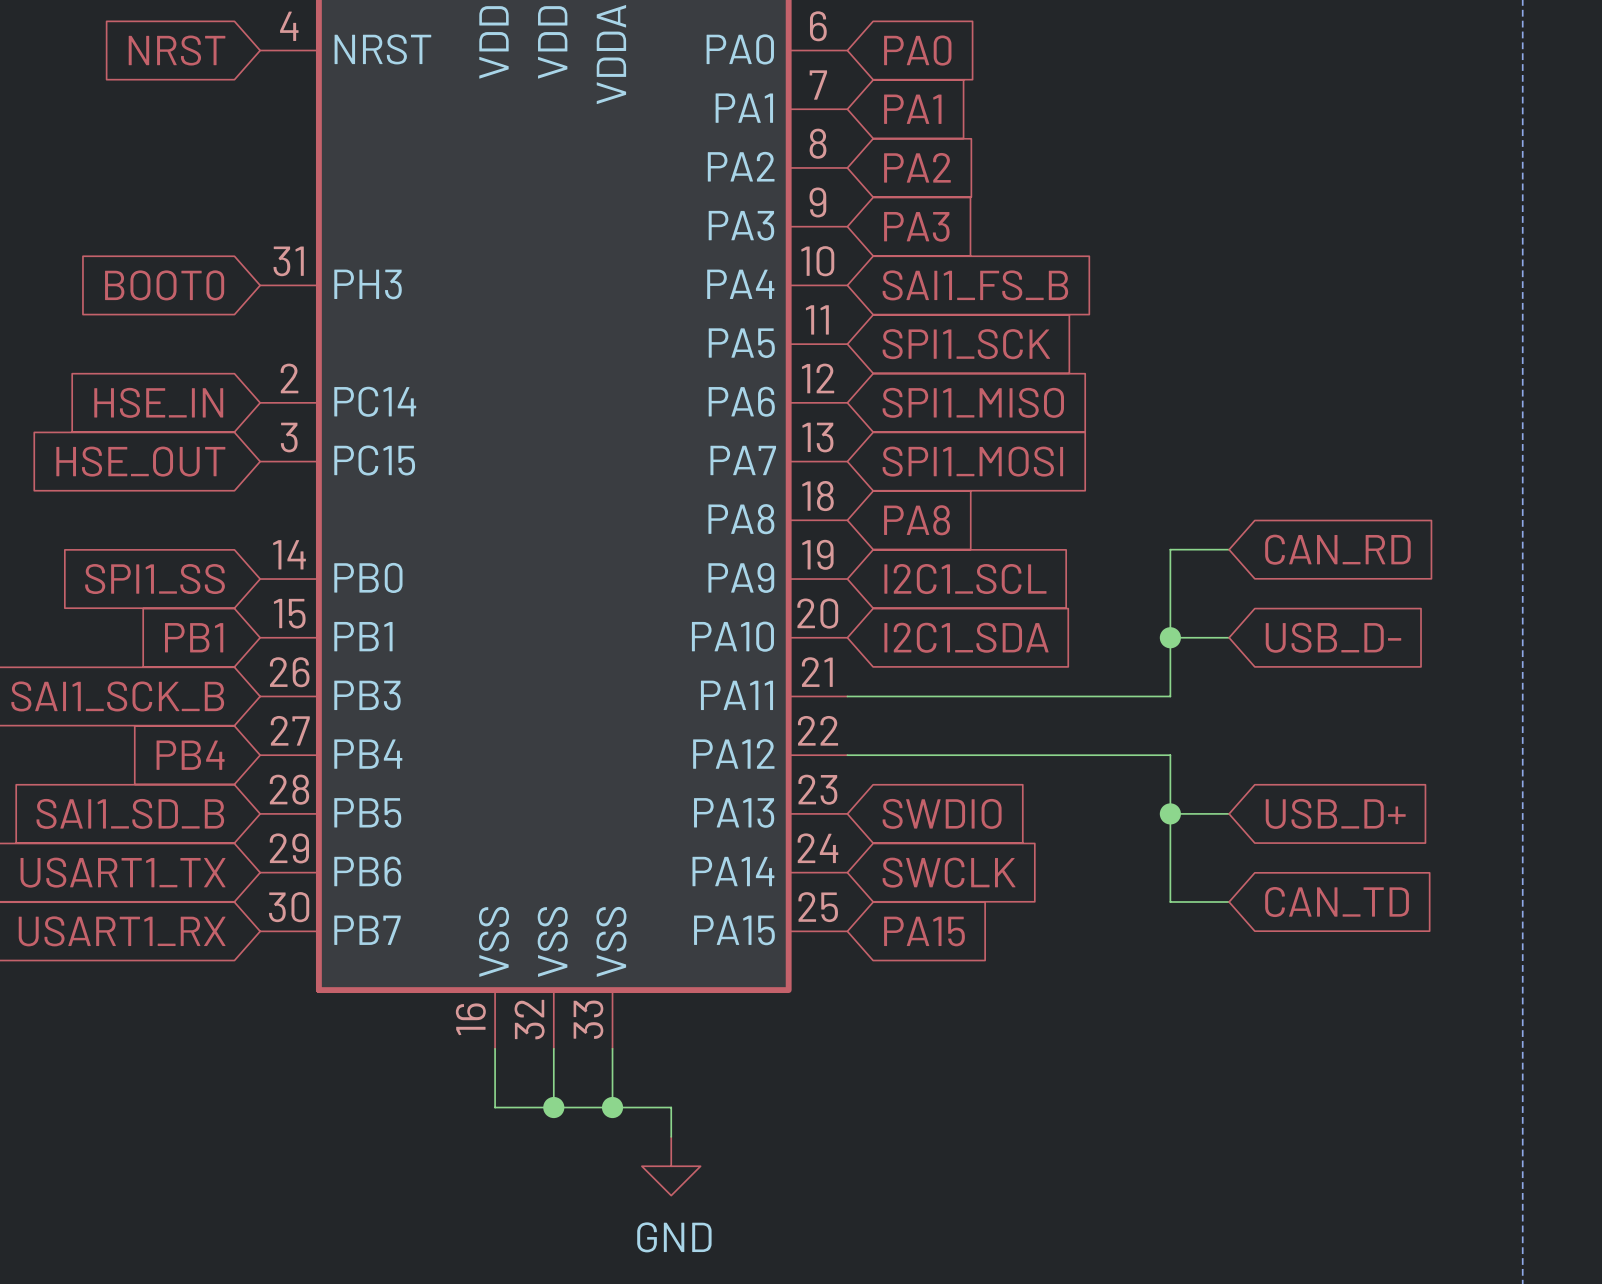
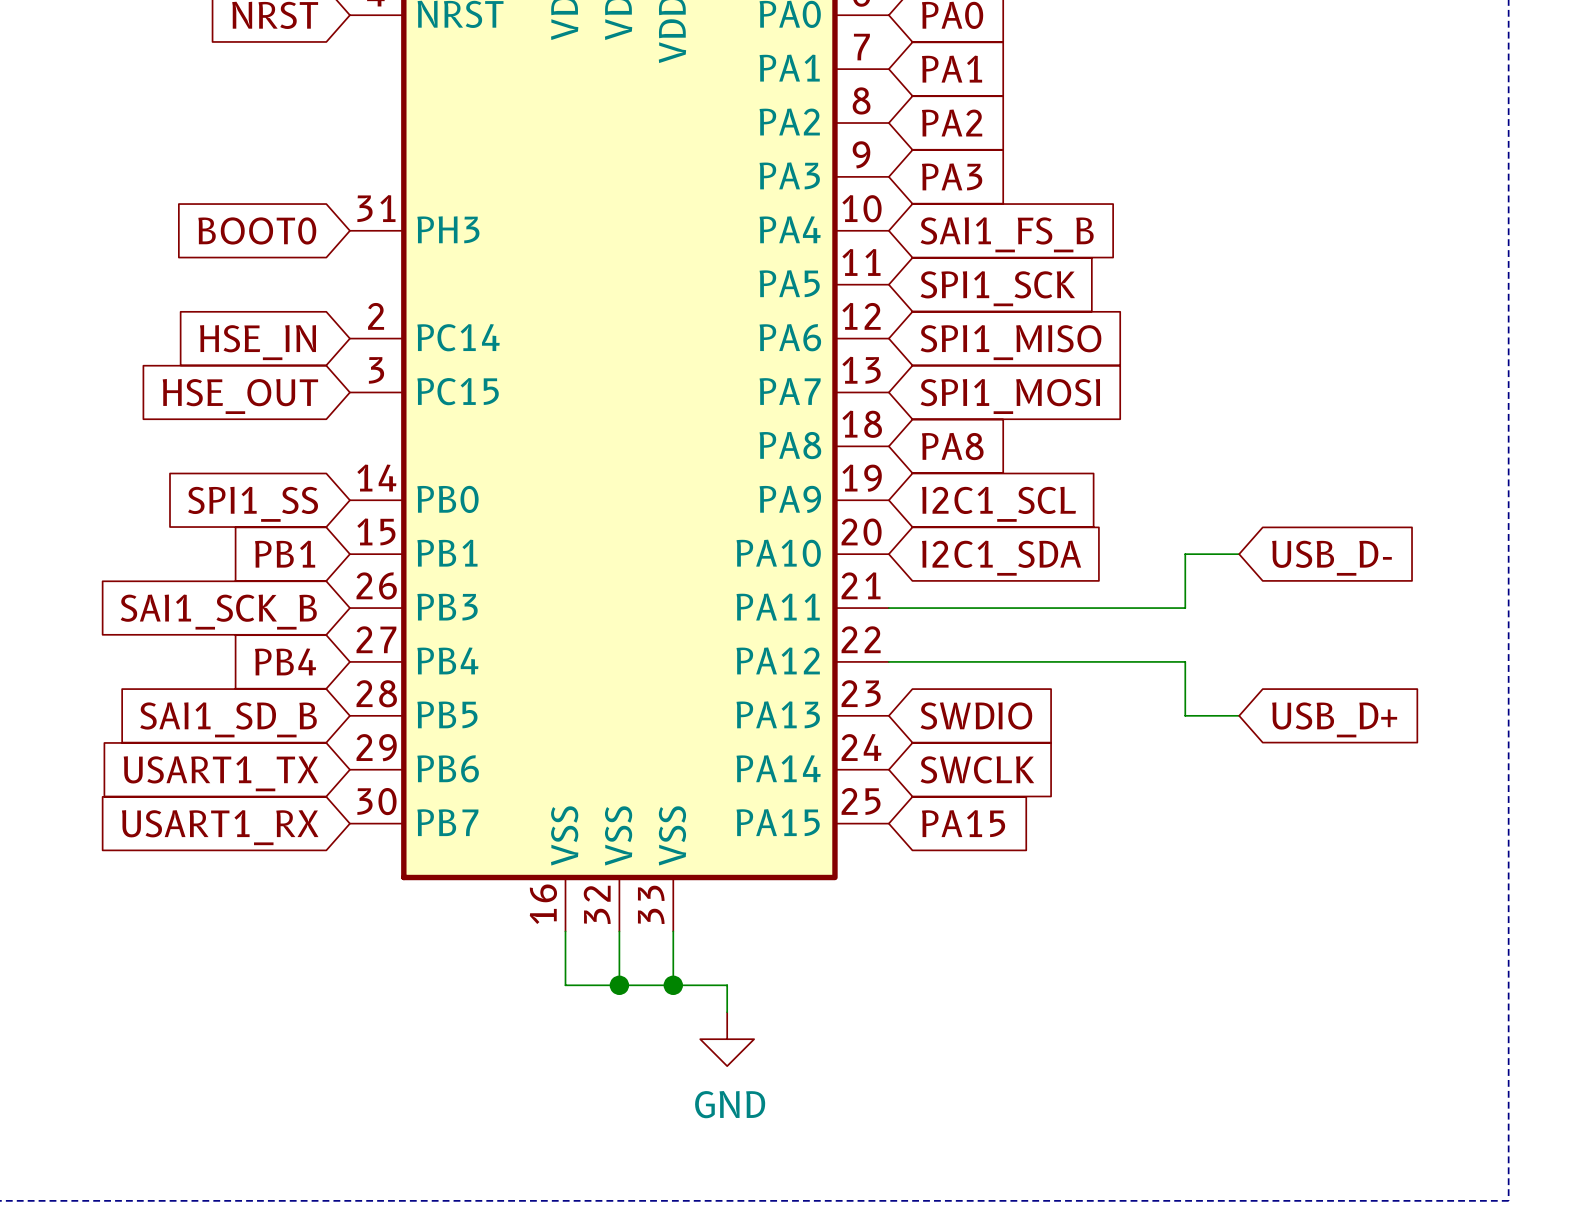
wire: (1229, 549) (1170, 549) (1170, 637) -> none
global label: CAN_RD (1337, 549) -> none
junction: (1170, 637) -> none
wire: (1170, 813) (1170, 902) (1229, 902) -> none
junction: (1170, 813) -> none
global label: CAN_TD (1337, 902) -> none

